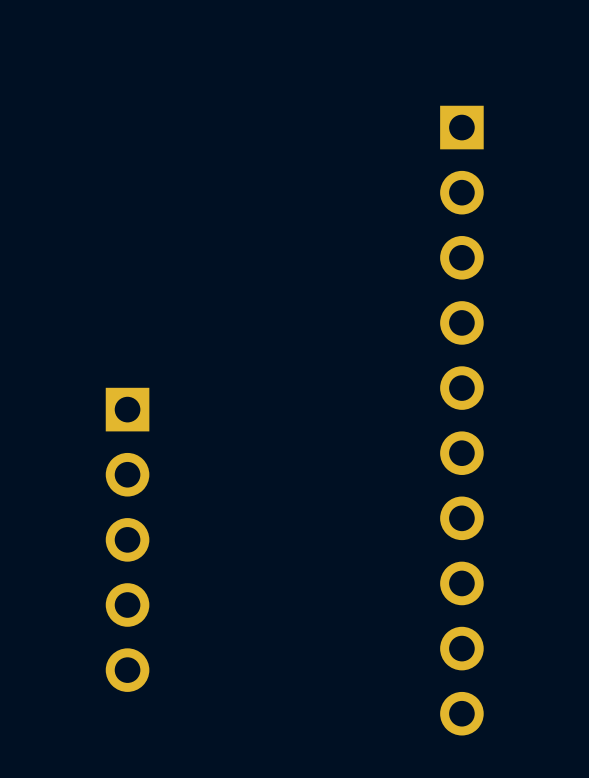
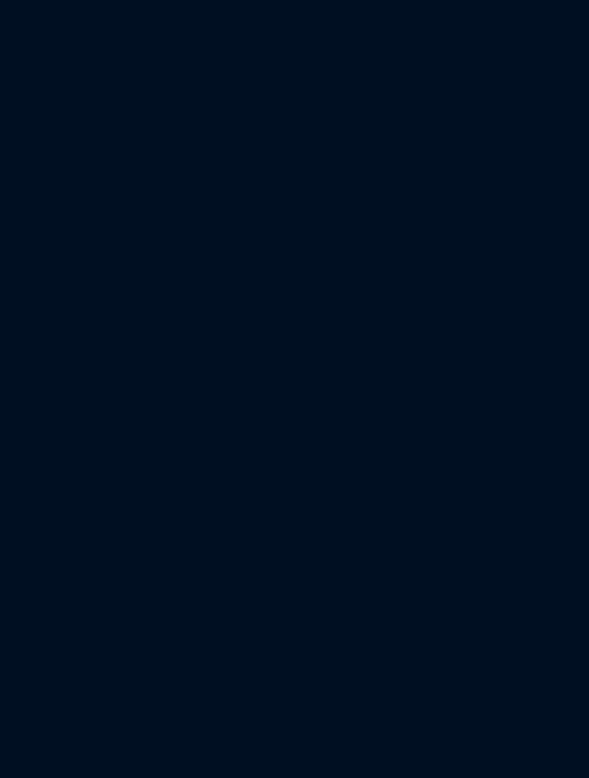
part: (461, 420) -> none
part: (127, 539) -> none

